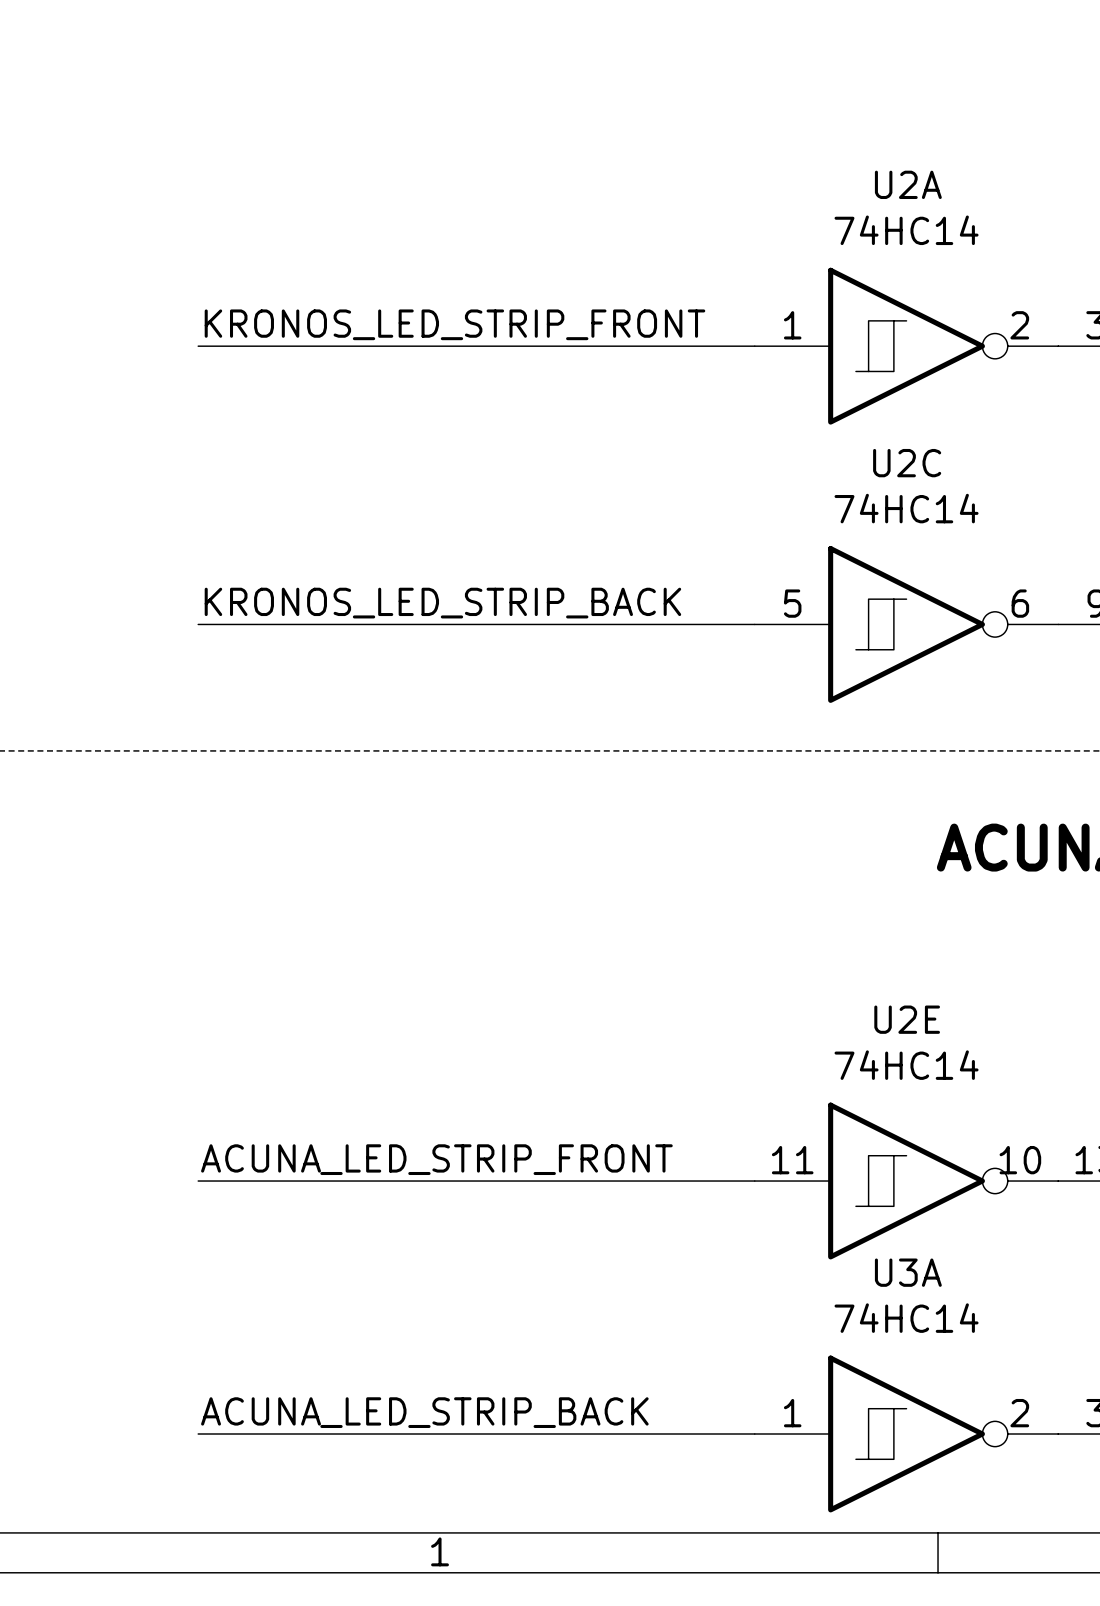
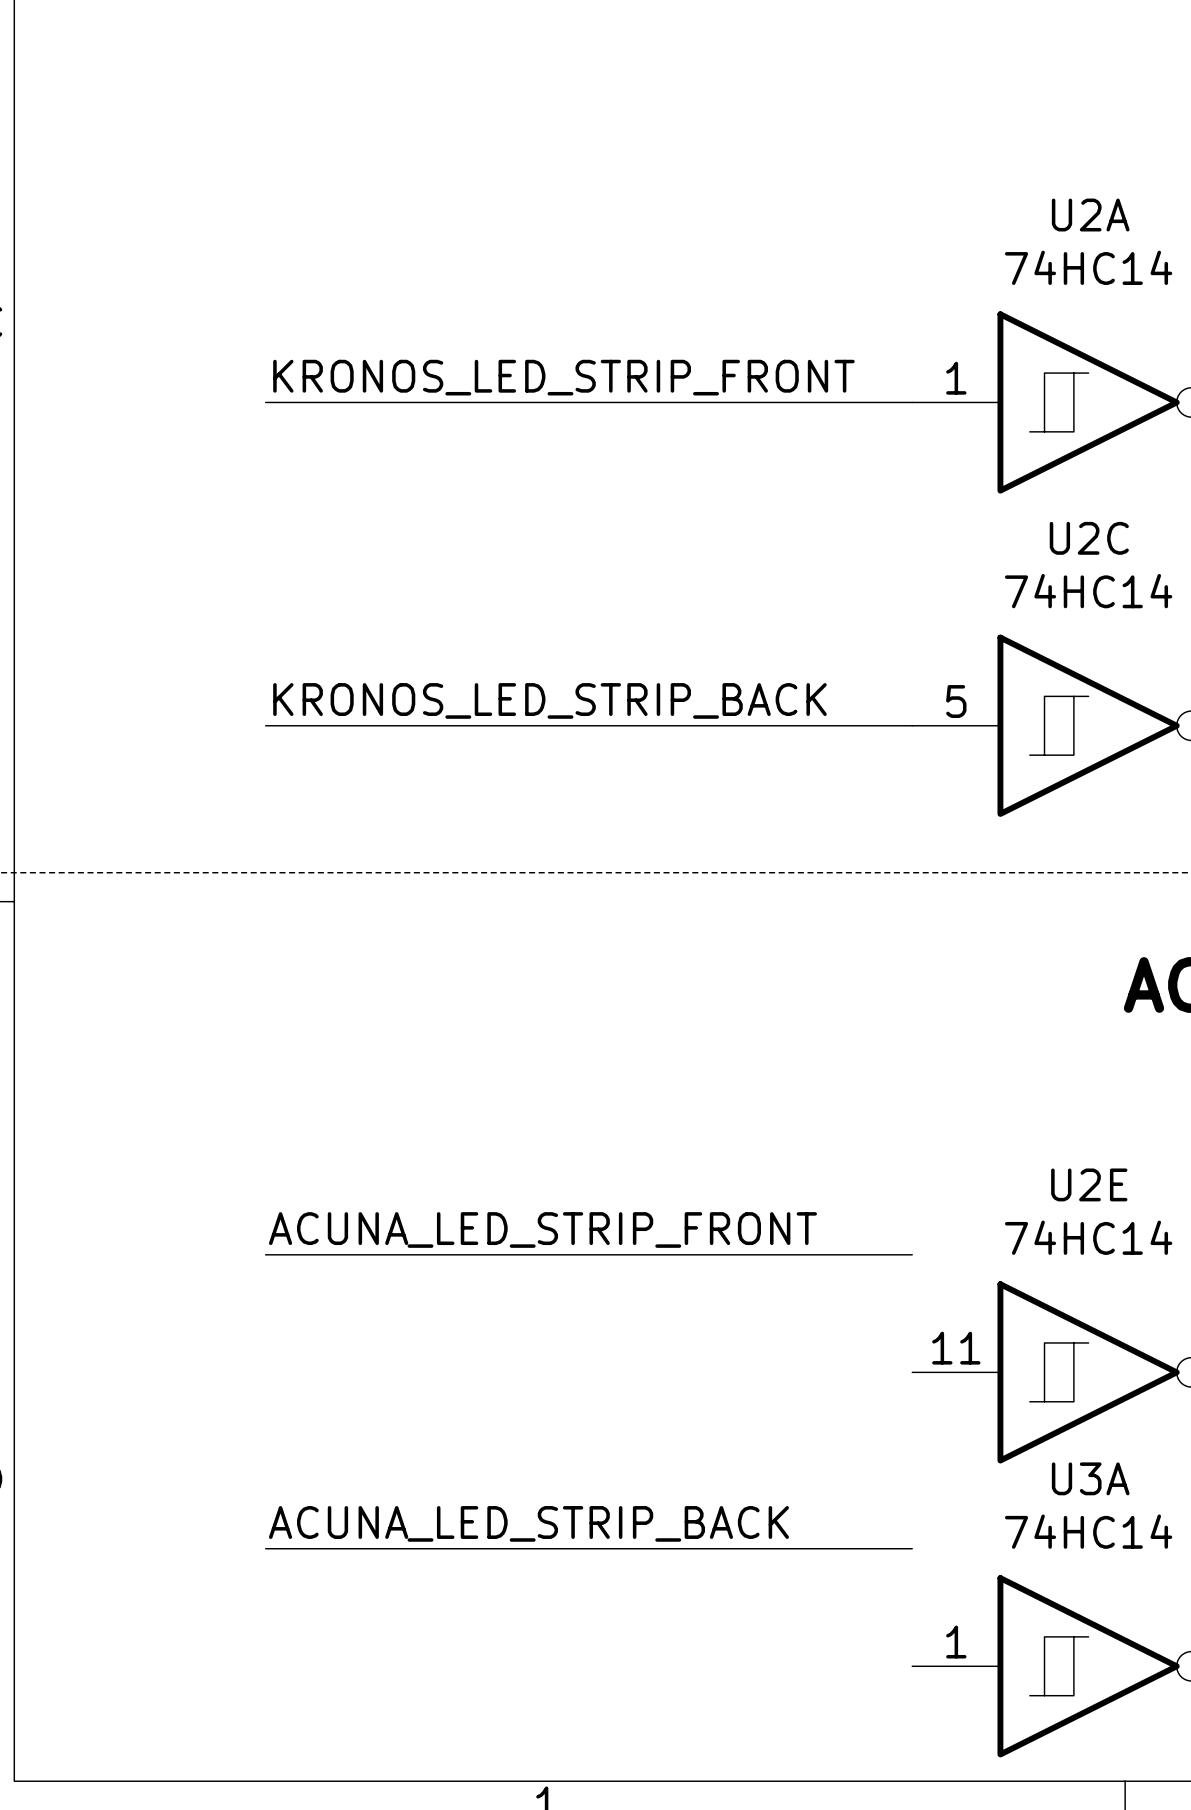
label position: ACUNA_LED_STRIP_FRONT (436, 1159) -> ACUNA_LED_STRIP_FRONT (542, 1229)
wire: (198, 1181) (754, 1181) -> (265, 1254) (912, 1254)
label position: ACUNA_LED_STRIP_BACK (424, 1412) -> ACUNA_LED_STRIP_BACK (528, 1523)
wire: (198, 1434) (754, 1434) -> (265, 1548) (912, 1548)

